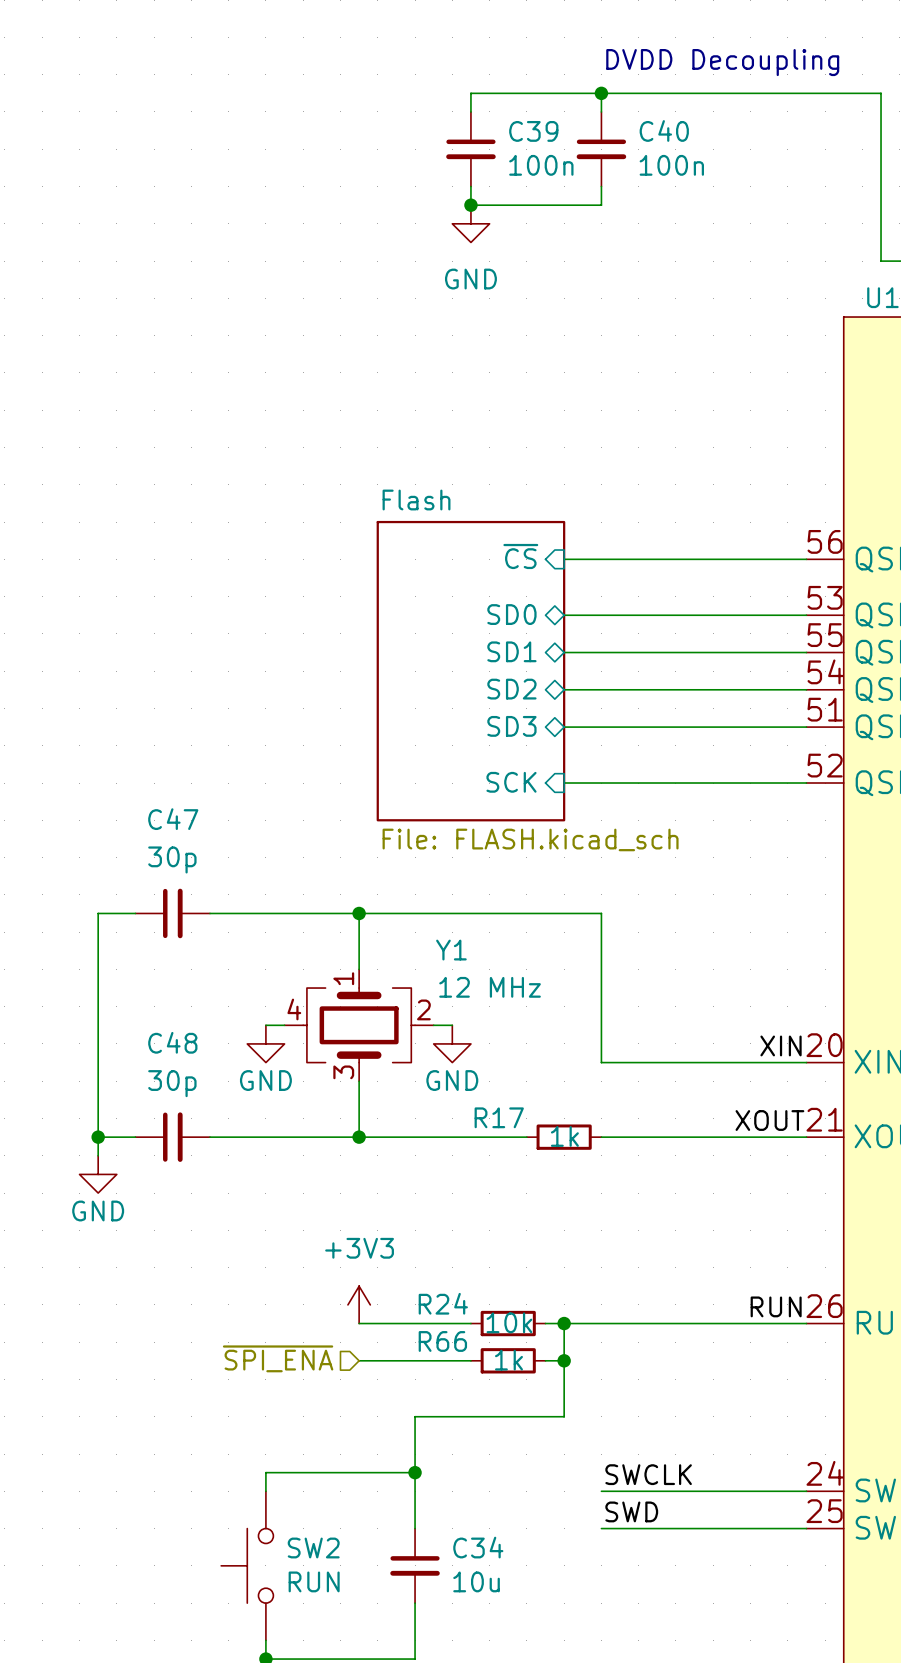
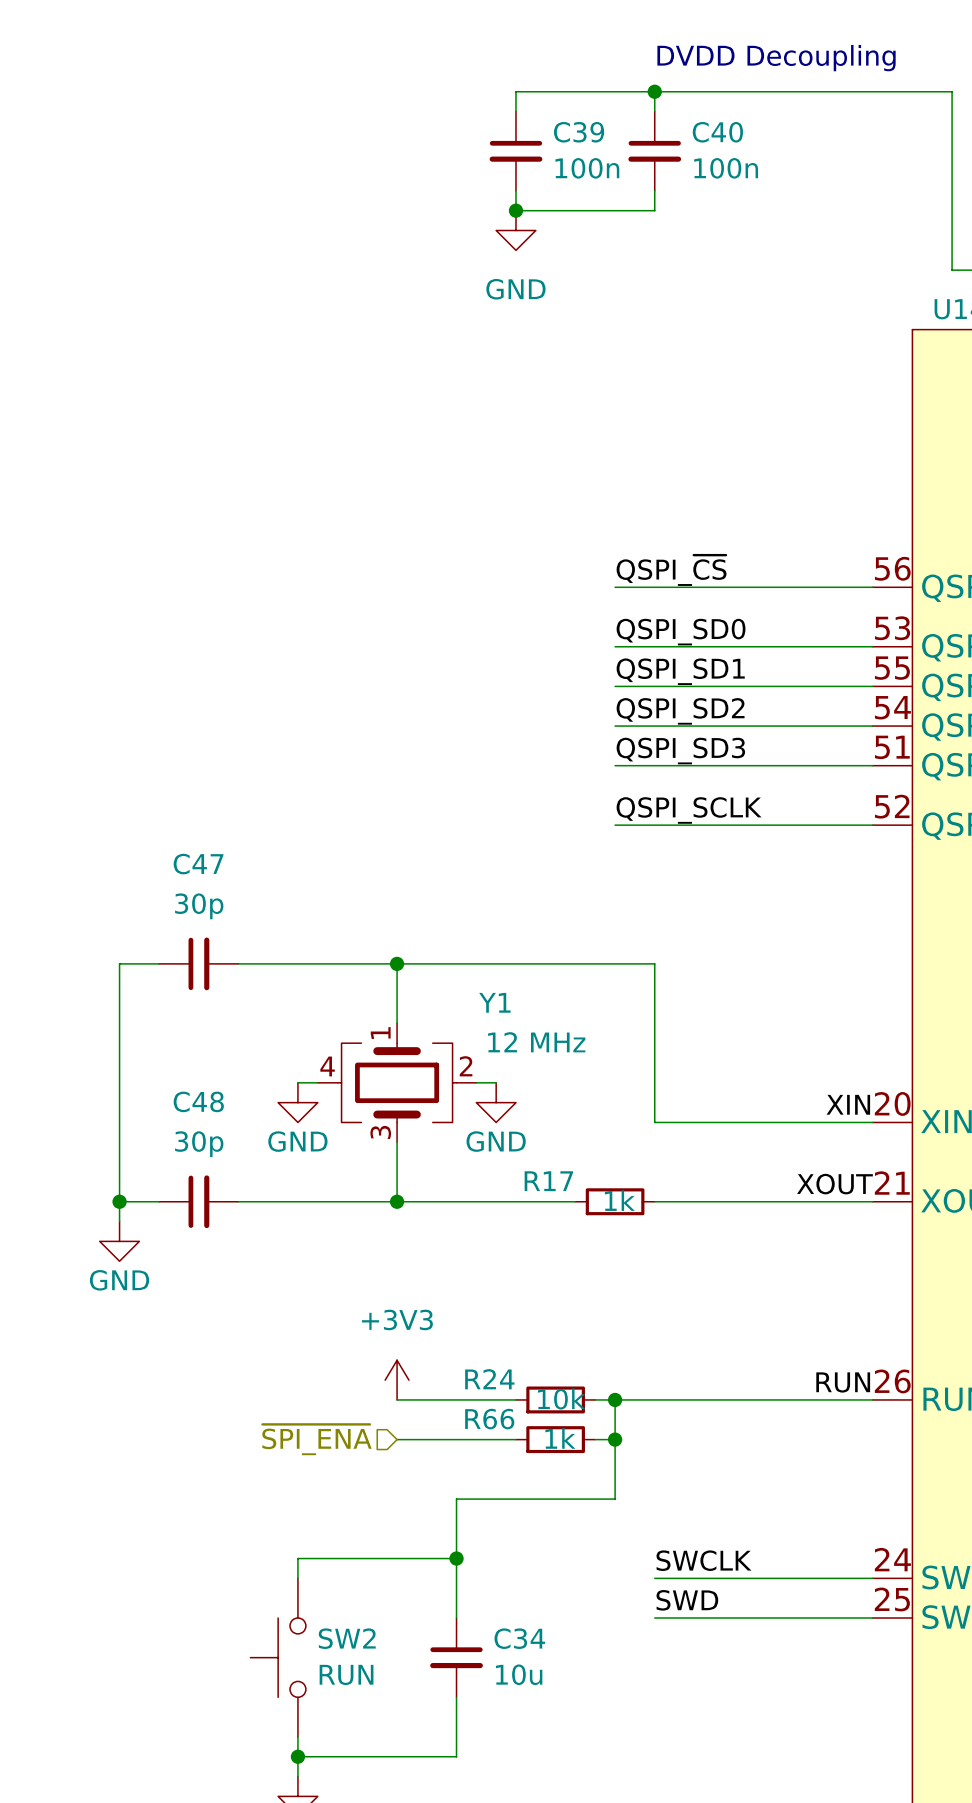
label: none -> QSPI_~{CS} (671, 570)
sheet pin: ~{CS} (520, 556) -> none
label: none -> QSPI_SD0 (681, 632)
sheet pin: SD0 (511, 614) -> none
label: none -> QSPI_SD1 (680, 671)
sheet pin: SD1 (511, 651) -> none
sheet Flash: File: FLASH.kicad_sch (470, 671) -> none
label: none -> QSPI_SD2 (680, 711)
sheet pin: SD2 (511, 689) -> none
label: none -> QSPI_SD3 (680, 751)
sheet pin: SD3 (511, 726) -> none
label: none -> QSPI_SCLK (689, 810)
sheet pin: SCK (511, 782) -> none

